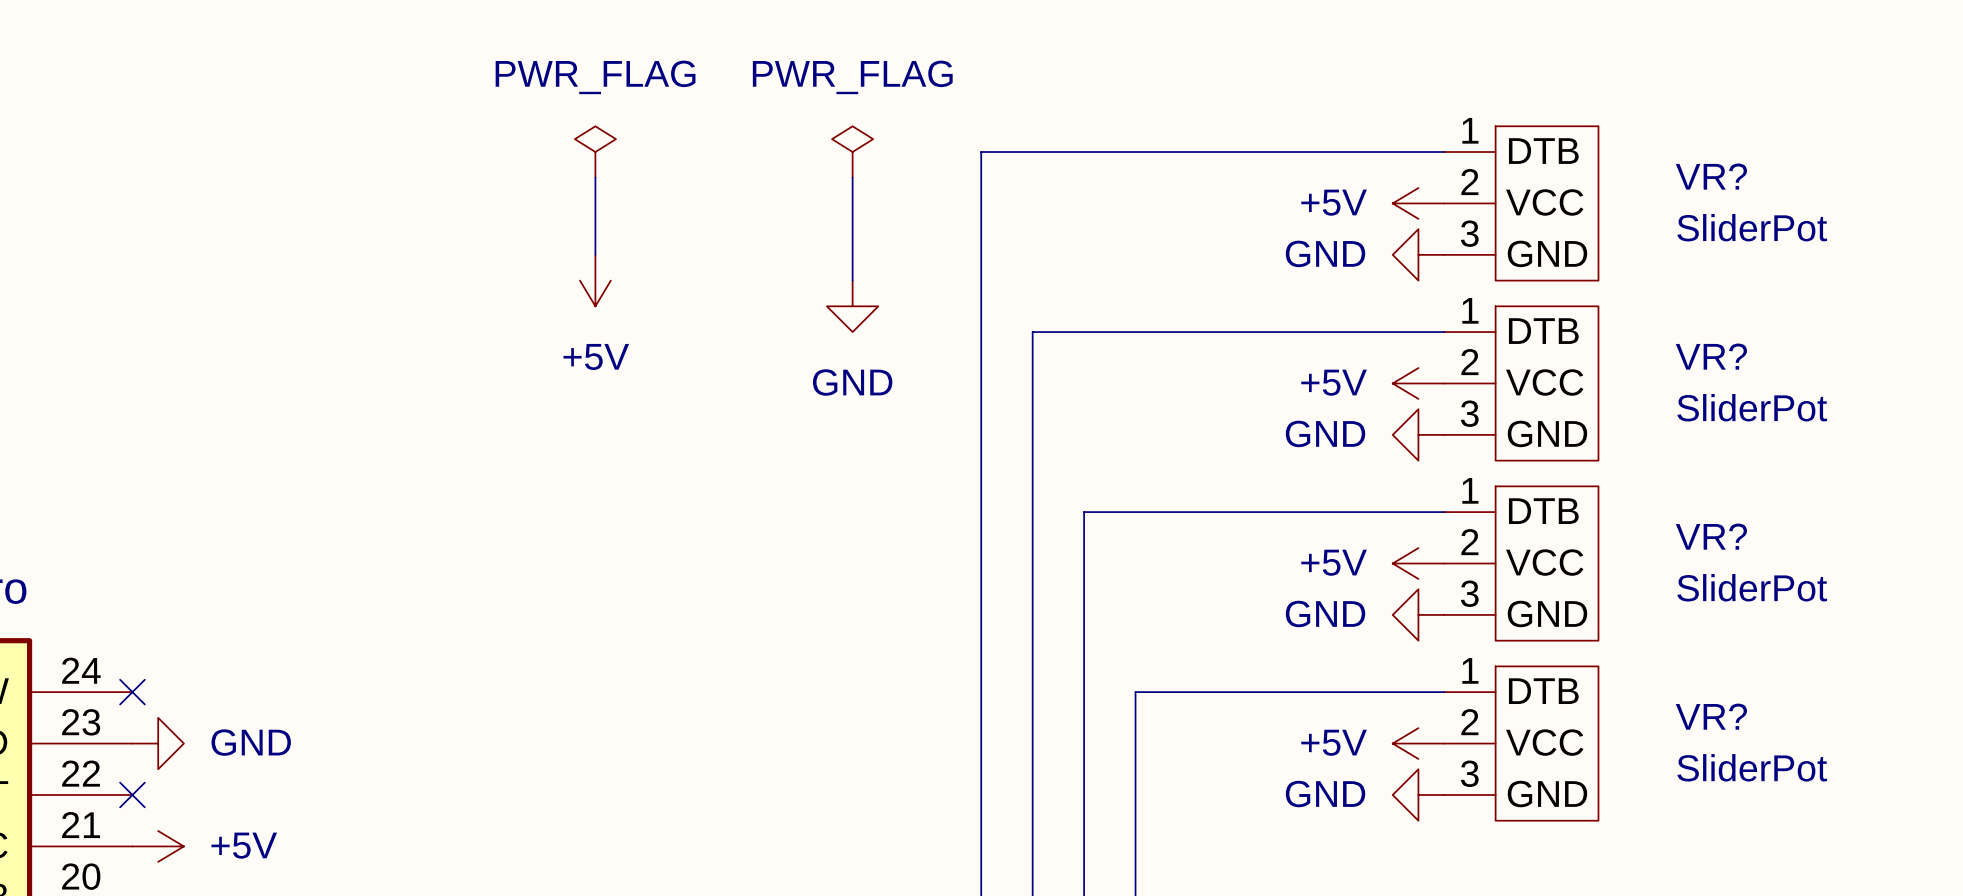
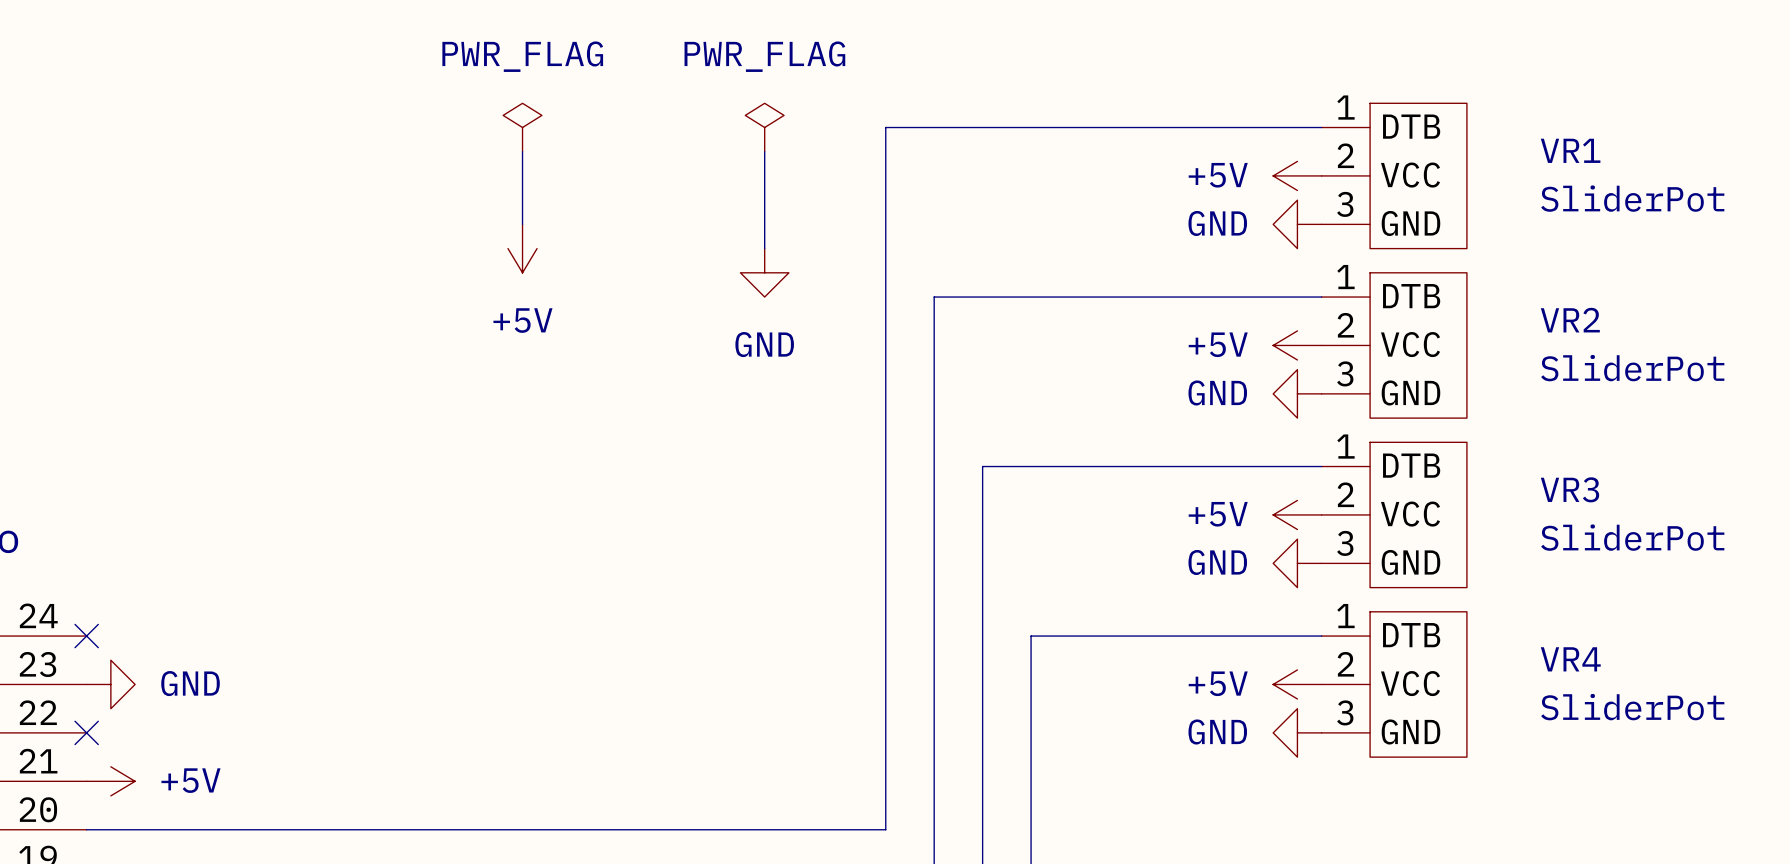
VR? name: VR? (1711, 176) -> VR1 (1570, 150)
VR? name: VR? (1711, 356) -> VR2 (1570, 320)
VR? name: VR? (1711, 536) -> VR3 (1569, 489)
VR? name: VR? (1711, 716) -> VR4 (1570, 659)

